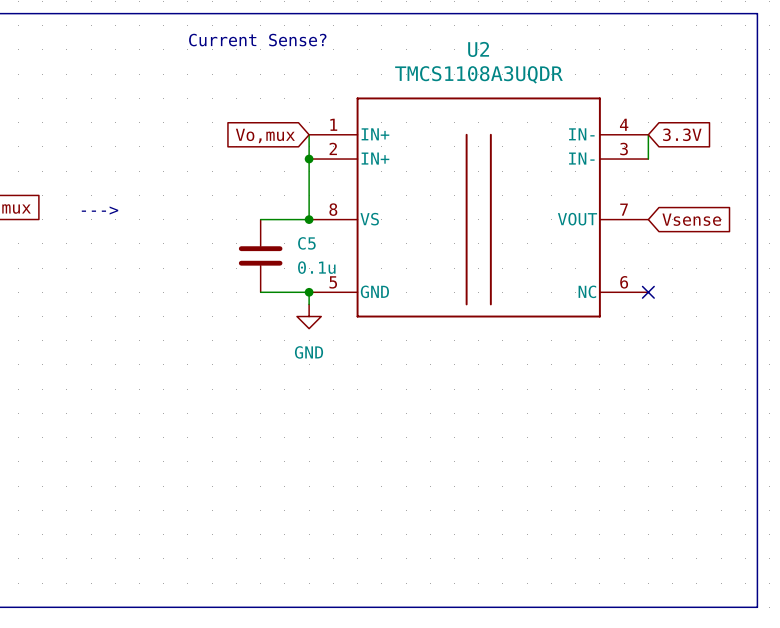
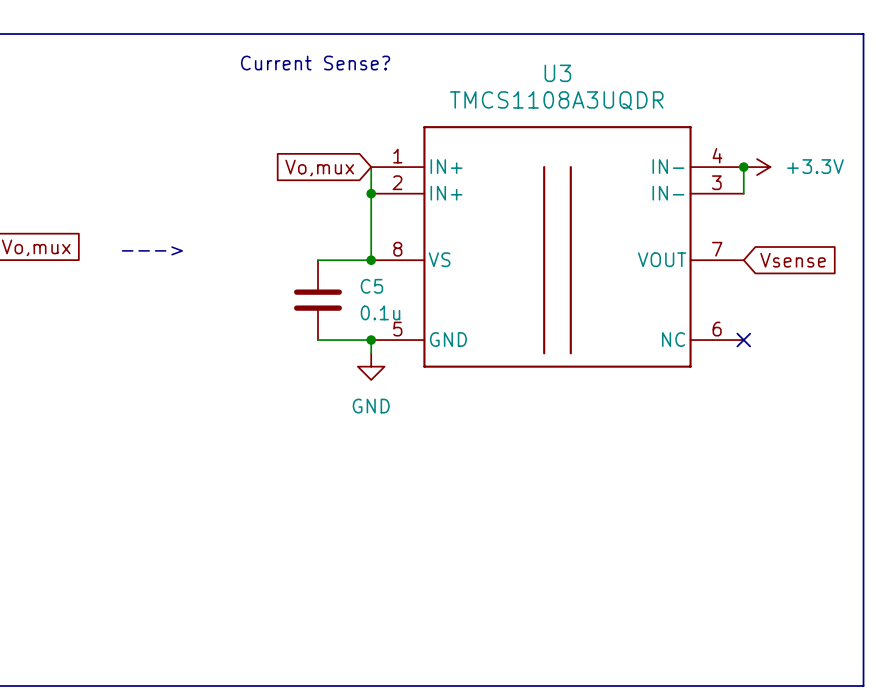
U2 name: U2 (478, 49) -> U3 (557, 73)
junction: none -> (743, 167)
power symbol: none -> +3.3V (757, 167)
global label: 3.3V (682, 134) -> none

